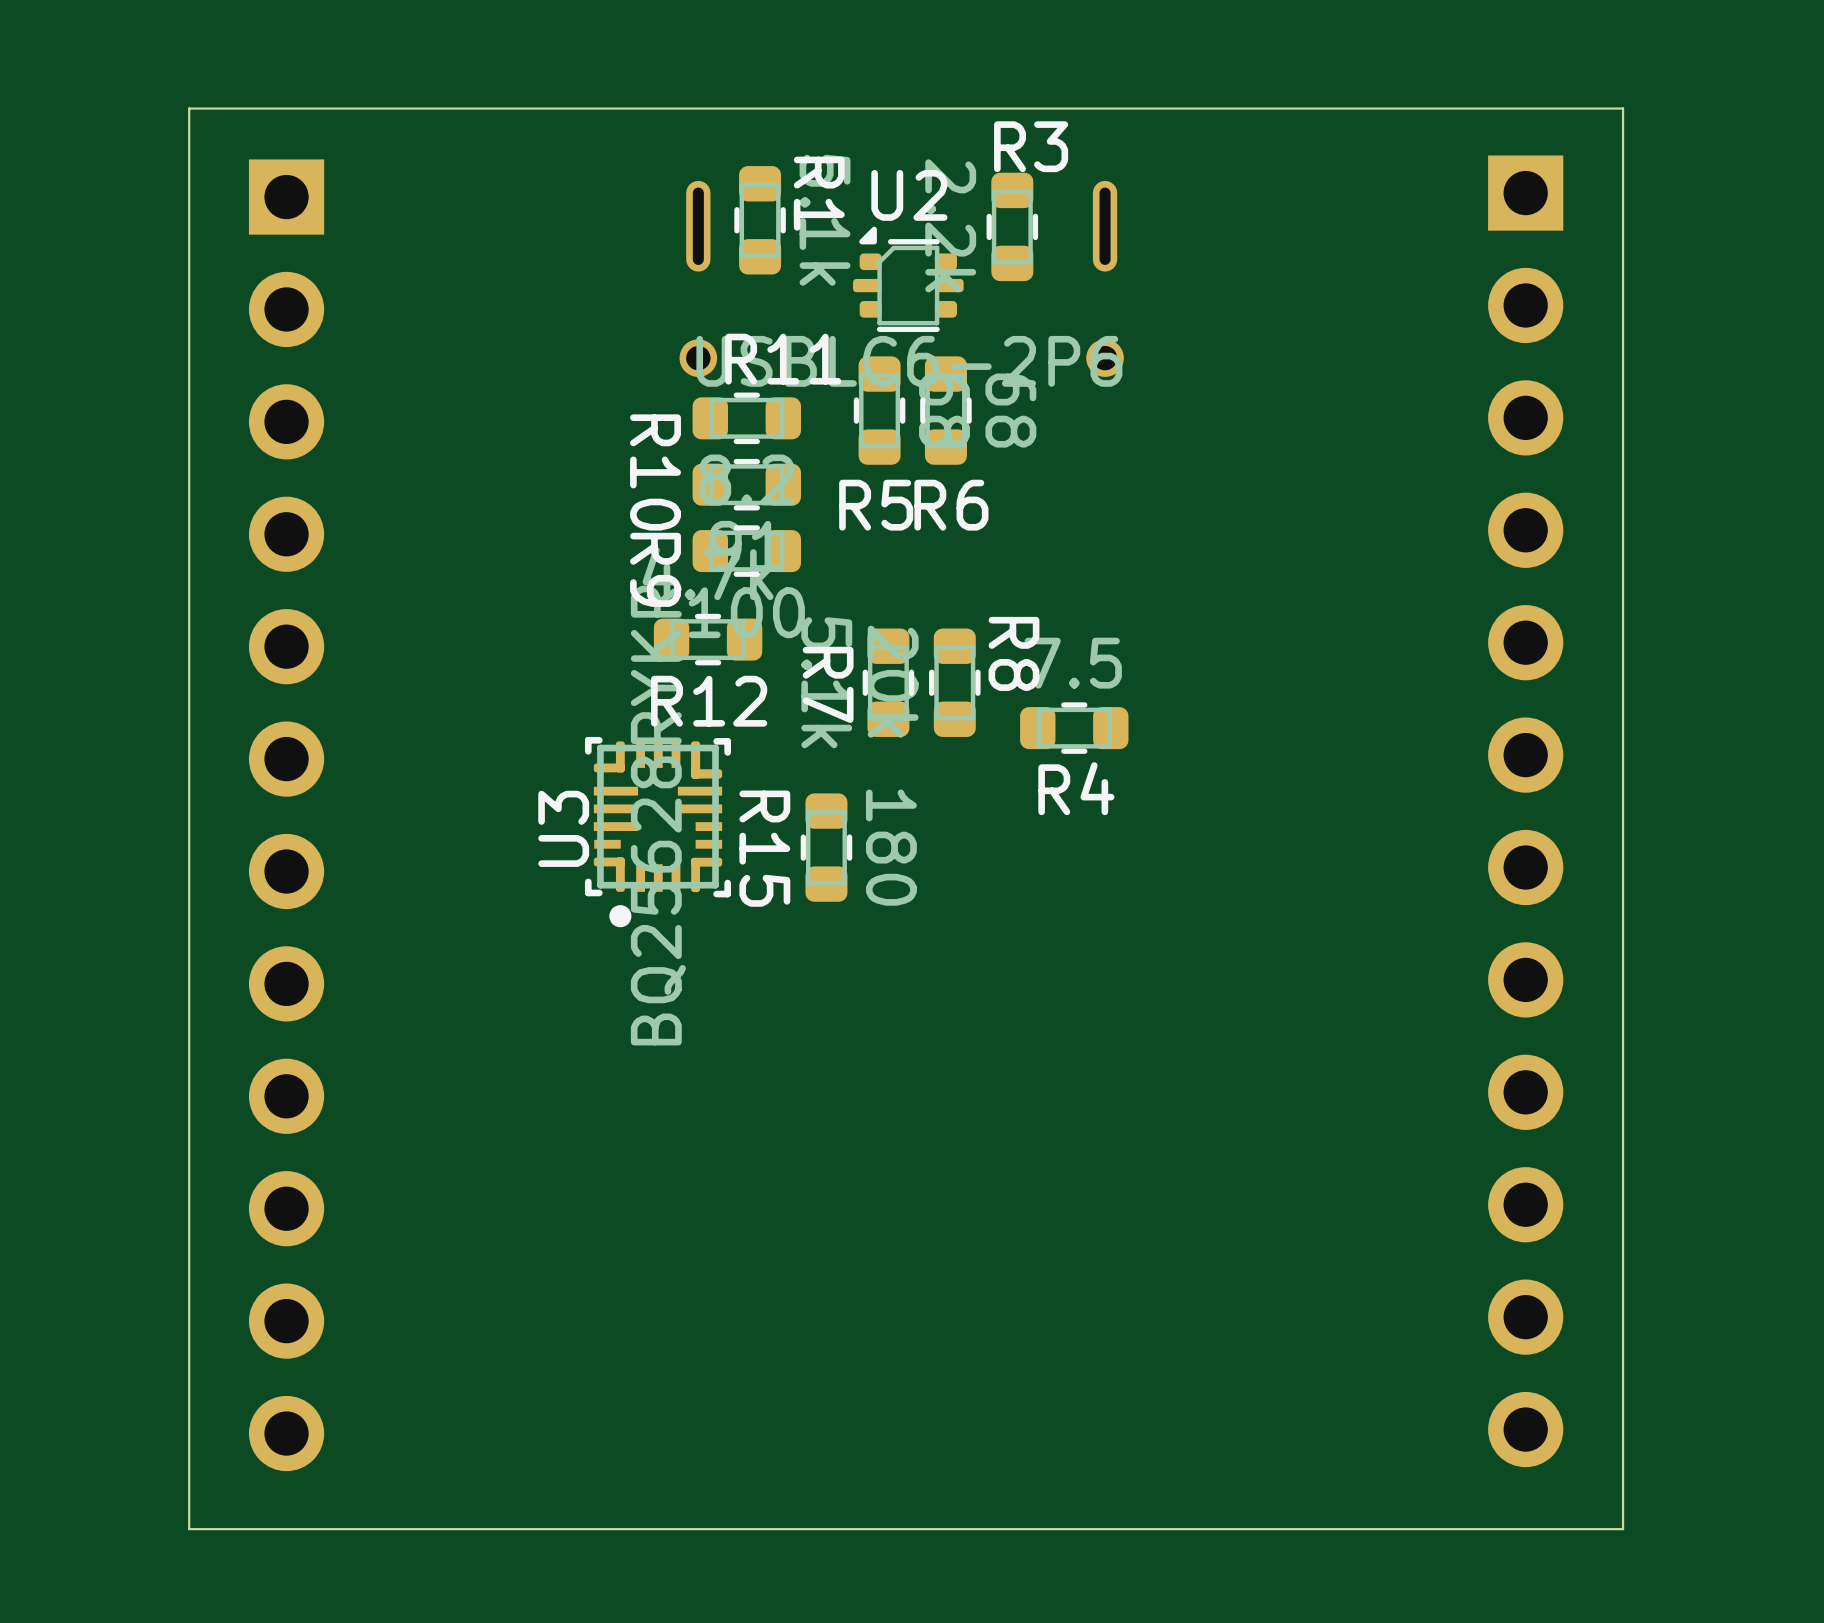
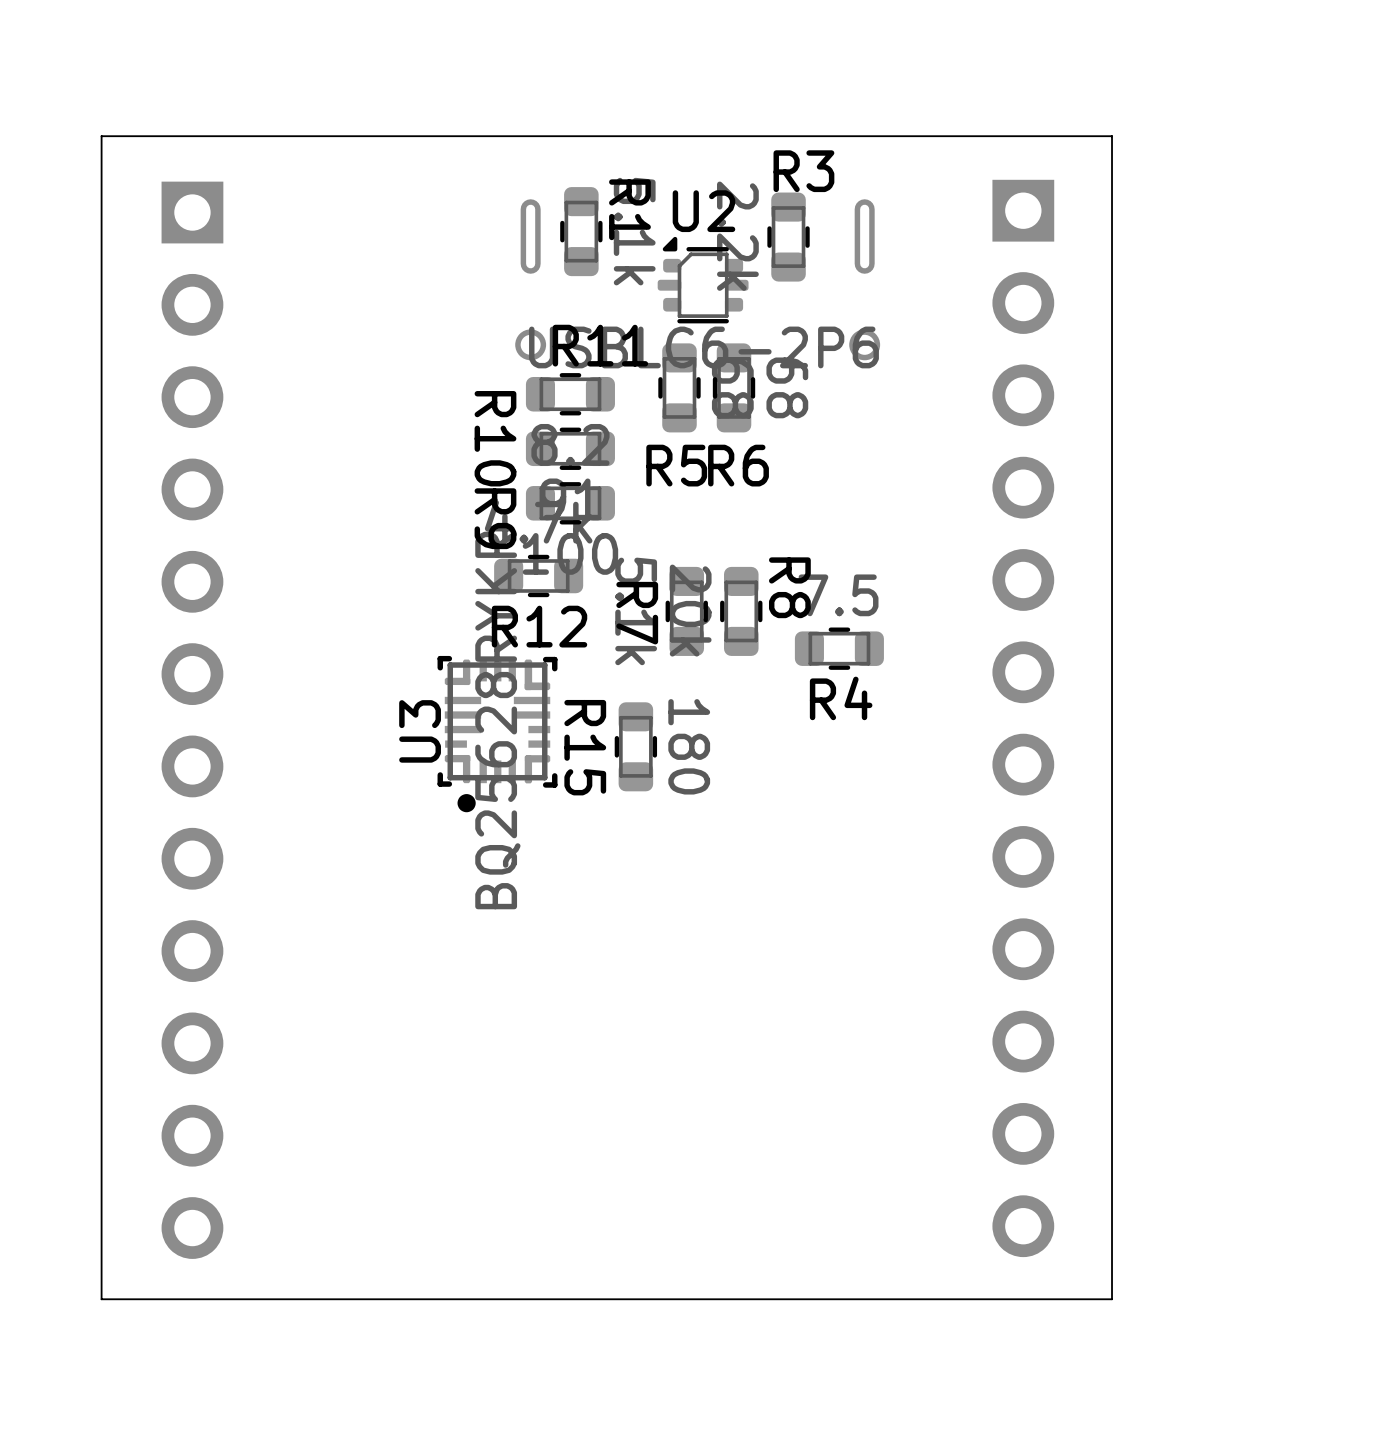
board edge: (1623, 108) (189, 108) (189, 1529) (1623, 1529) (1623, 108) -> (1112, 136) (1112, 1299) (101, 1299) (101, 136) (1112, 136)
part position: (1525, 811) -> (1023, 718)

